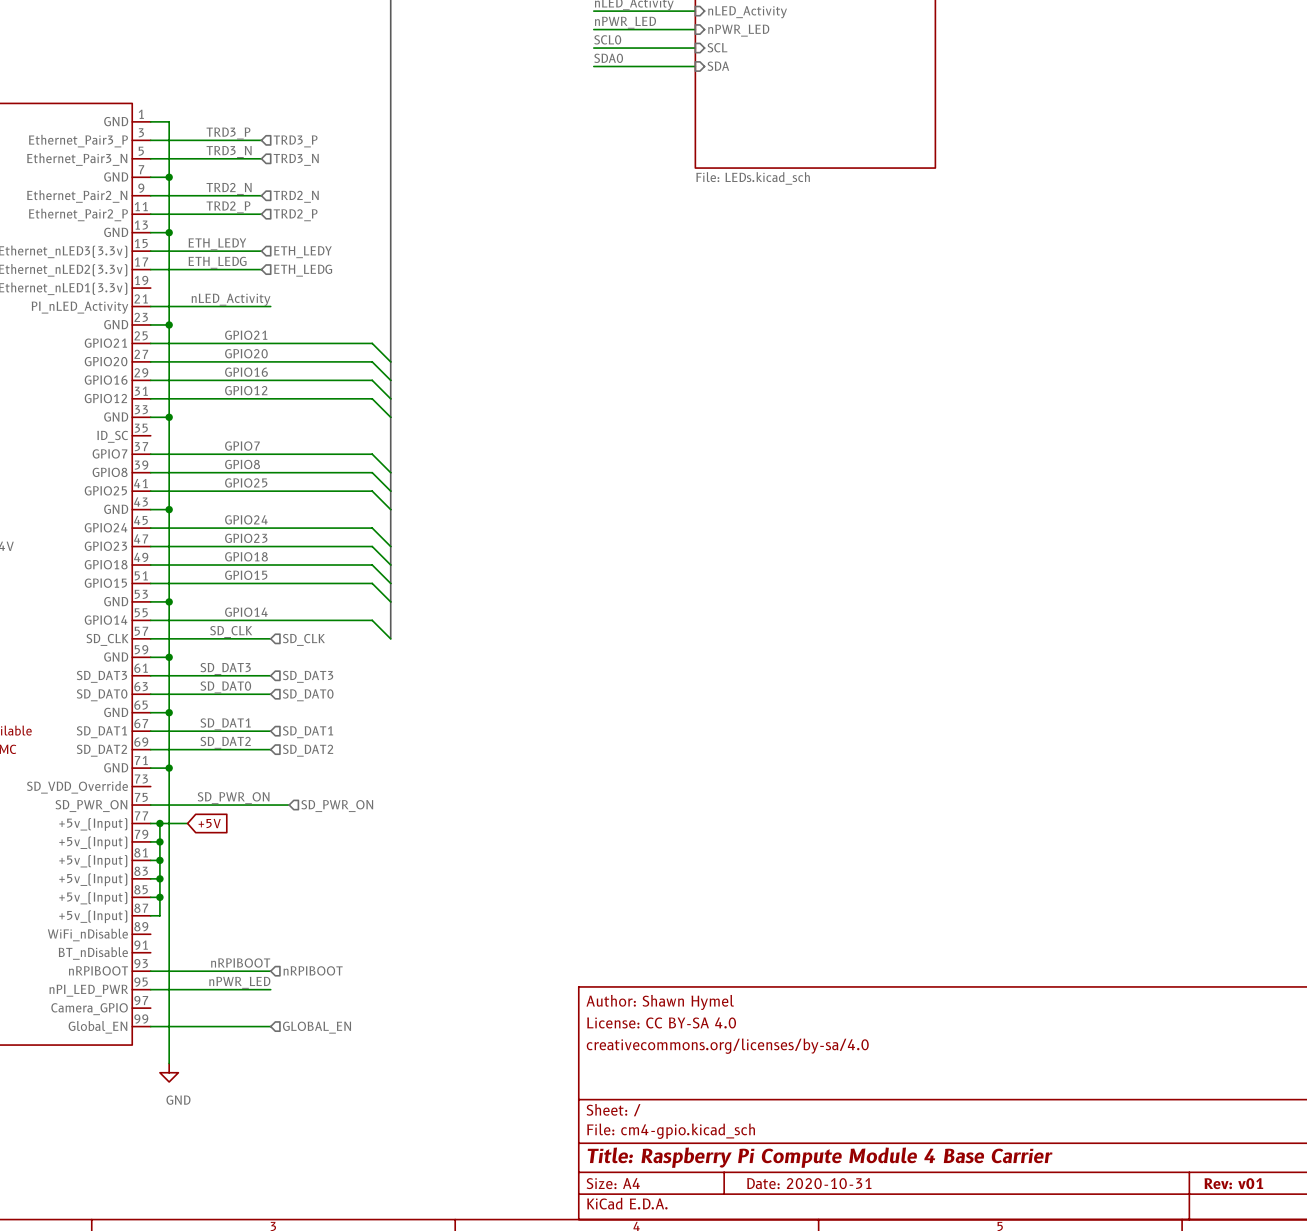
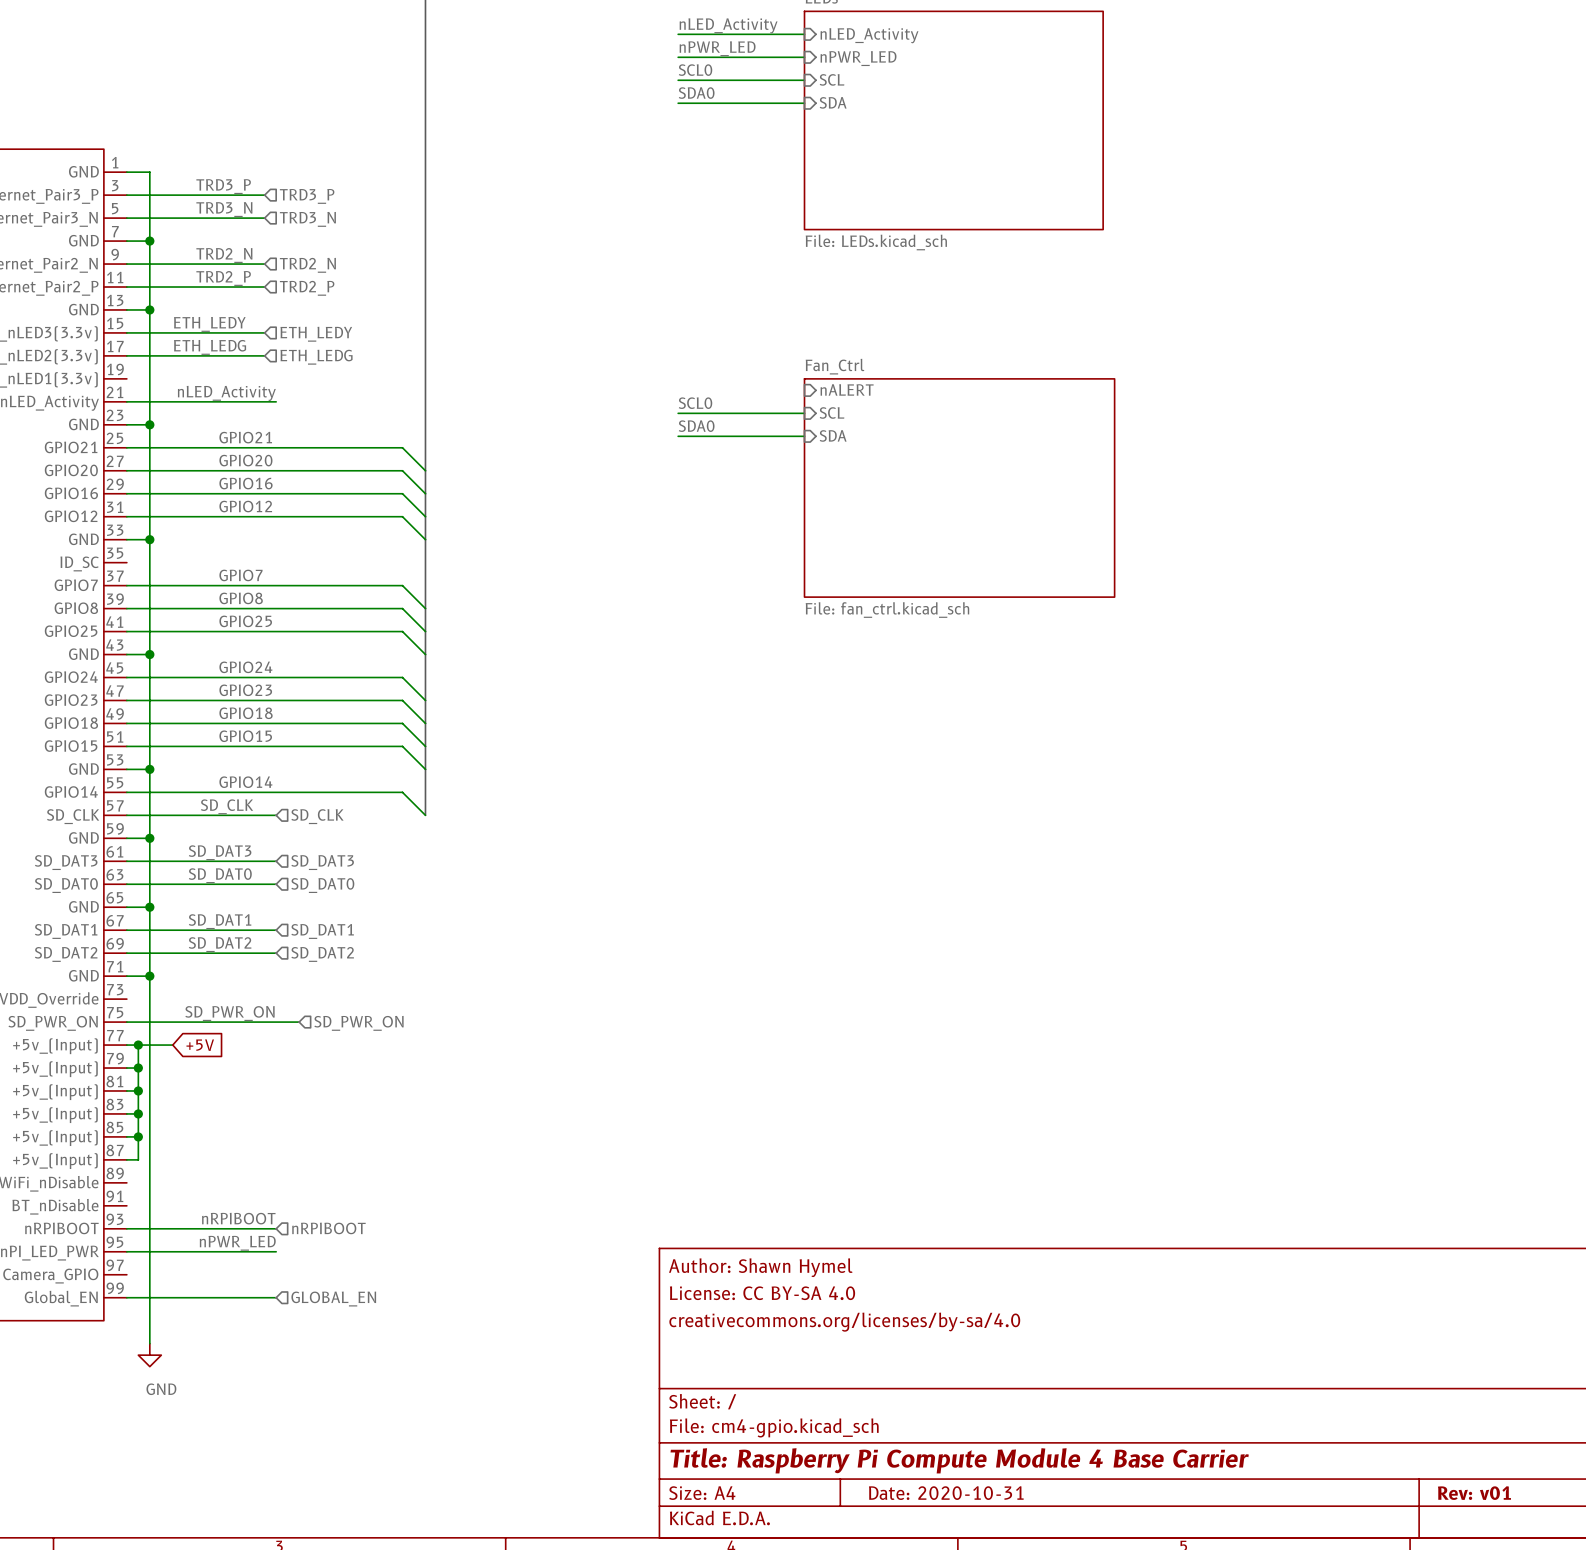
sheet pin: none -> nALERT (847, 389)
label: none -> SCL0 (695, 403)
wire: none -> (678, 413) (804, 413)
sheet pin: none -> SCL (832, 412)
label: none -> SDA0 (696, 426)
sheet pin: none -> SDA (833, 435)
wire: none -> (678, 436) (804, 436)
sheet Fan_Ctrl: none -> File: fan_ctrl.kicad_sch (959, 488)

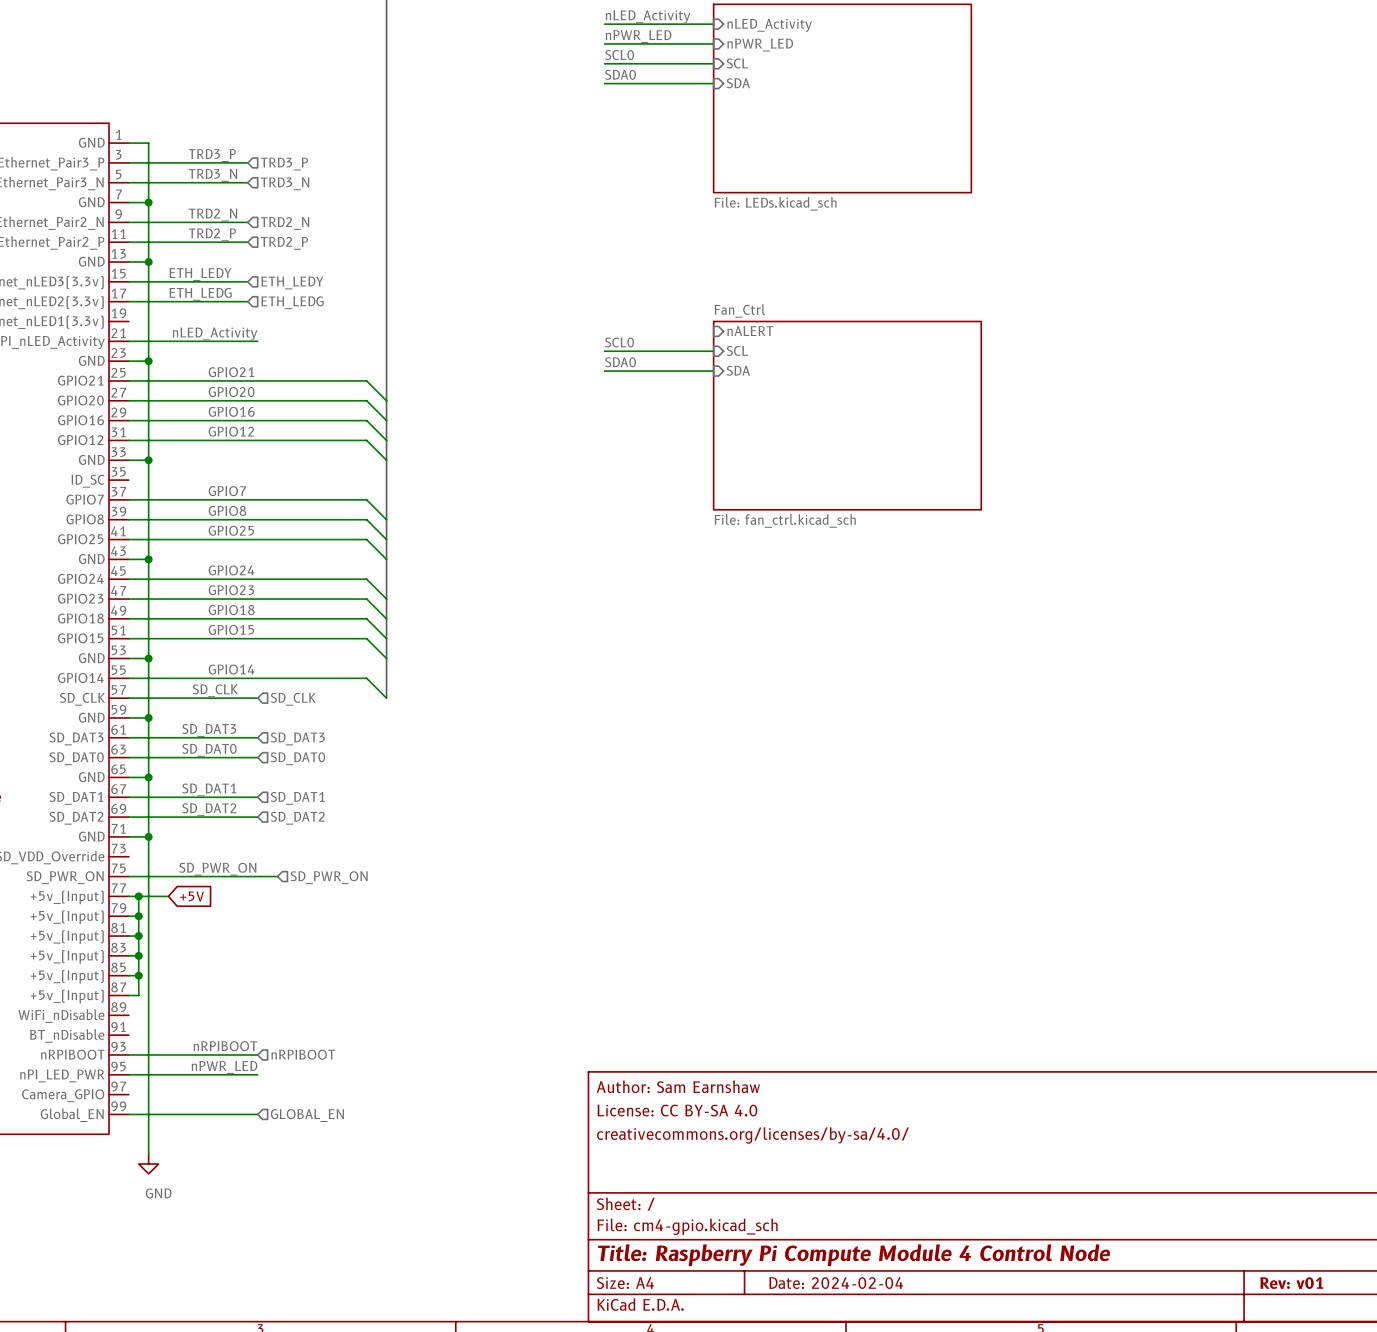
title block: Author: Shawn Hymel (760, 1267) -> Author: Sam Earnshaw (678, 1086)
title block: creativecommons.org/licenses/by-sa/4.0 (844, 1322) -> creativecommons.org/licenses/by-sa/4.0/ (752, 1135)
title block: Title: Raspberry Pi Compute Module 4 Base Carrier (959, 1460) -> Title: Raspberry Pi Compute Module 4 Control Node (854, 1255)
title block: Date: 2020-10-31 (946, 1493) -> Date: 2024-02-04 (836, 1283)

